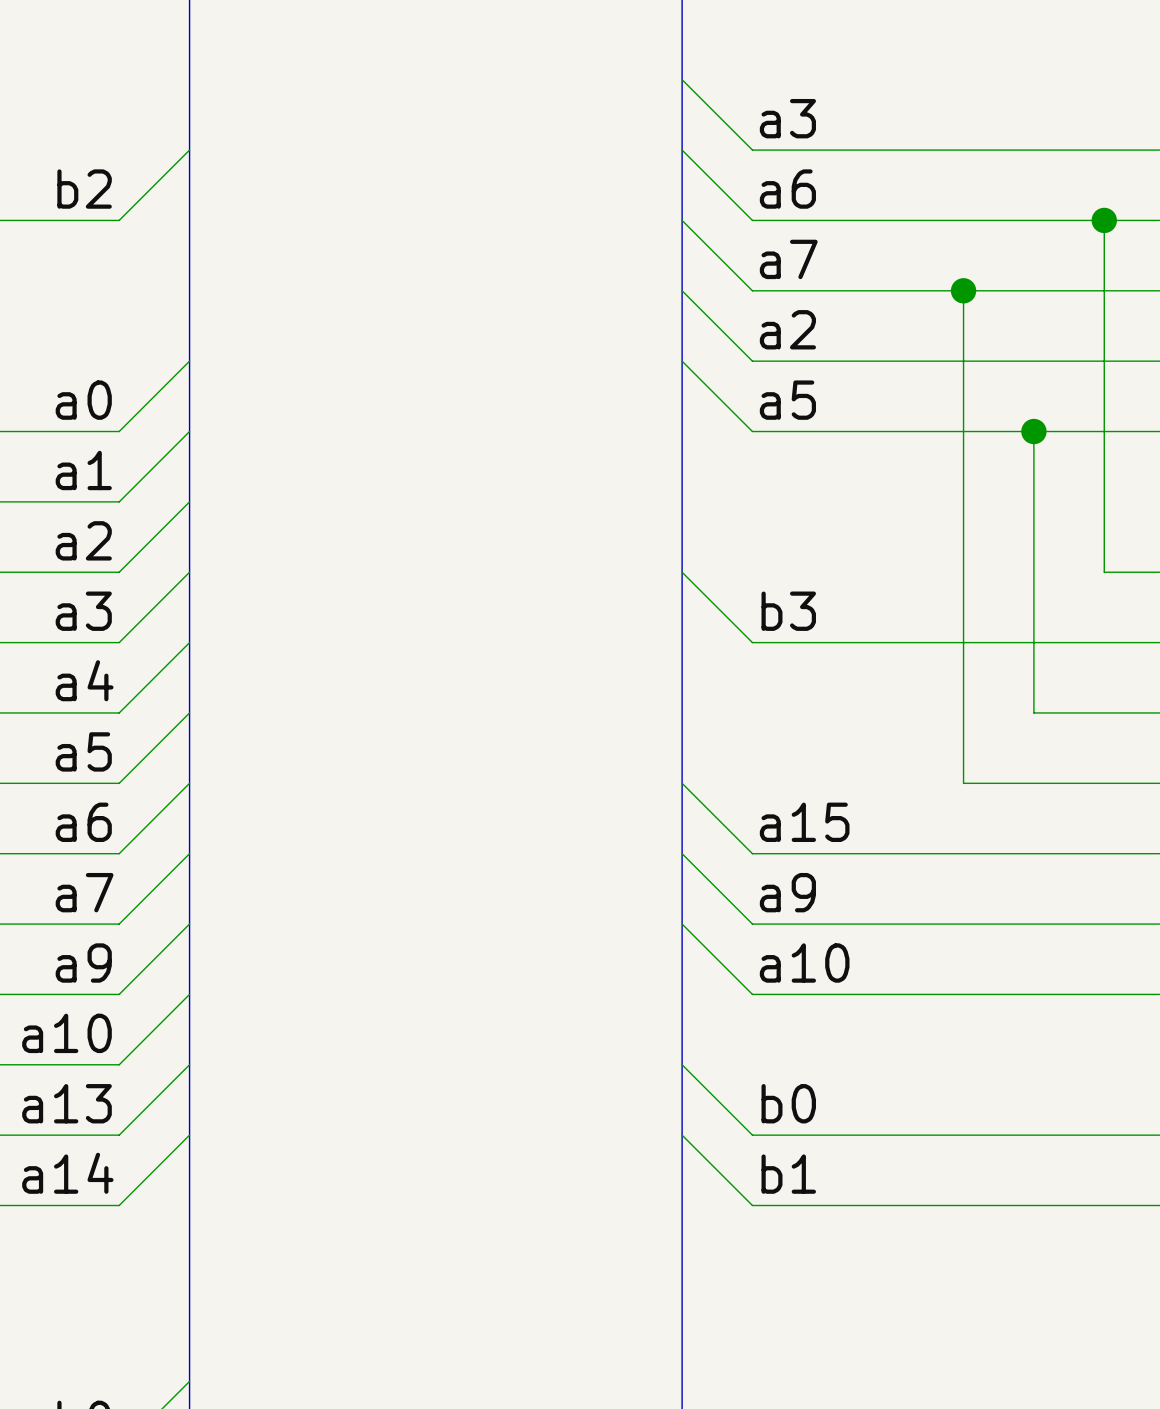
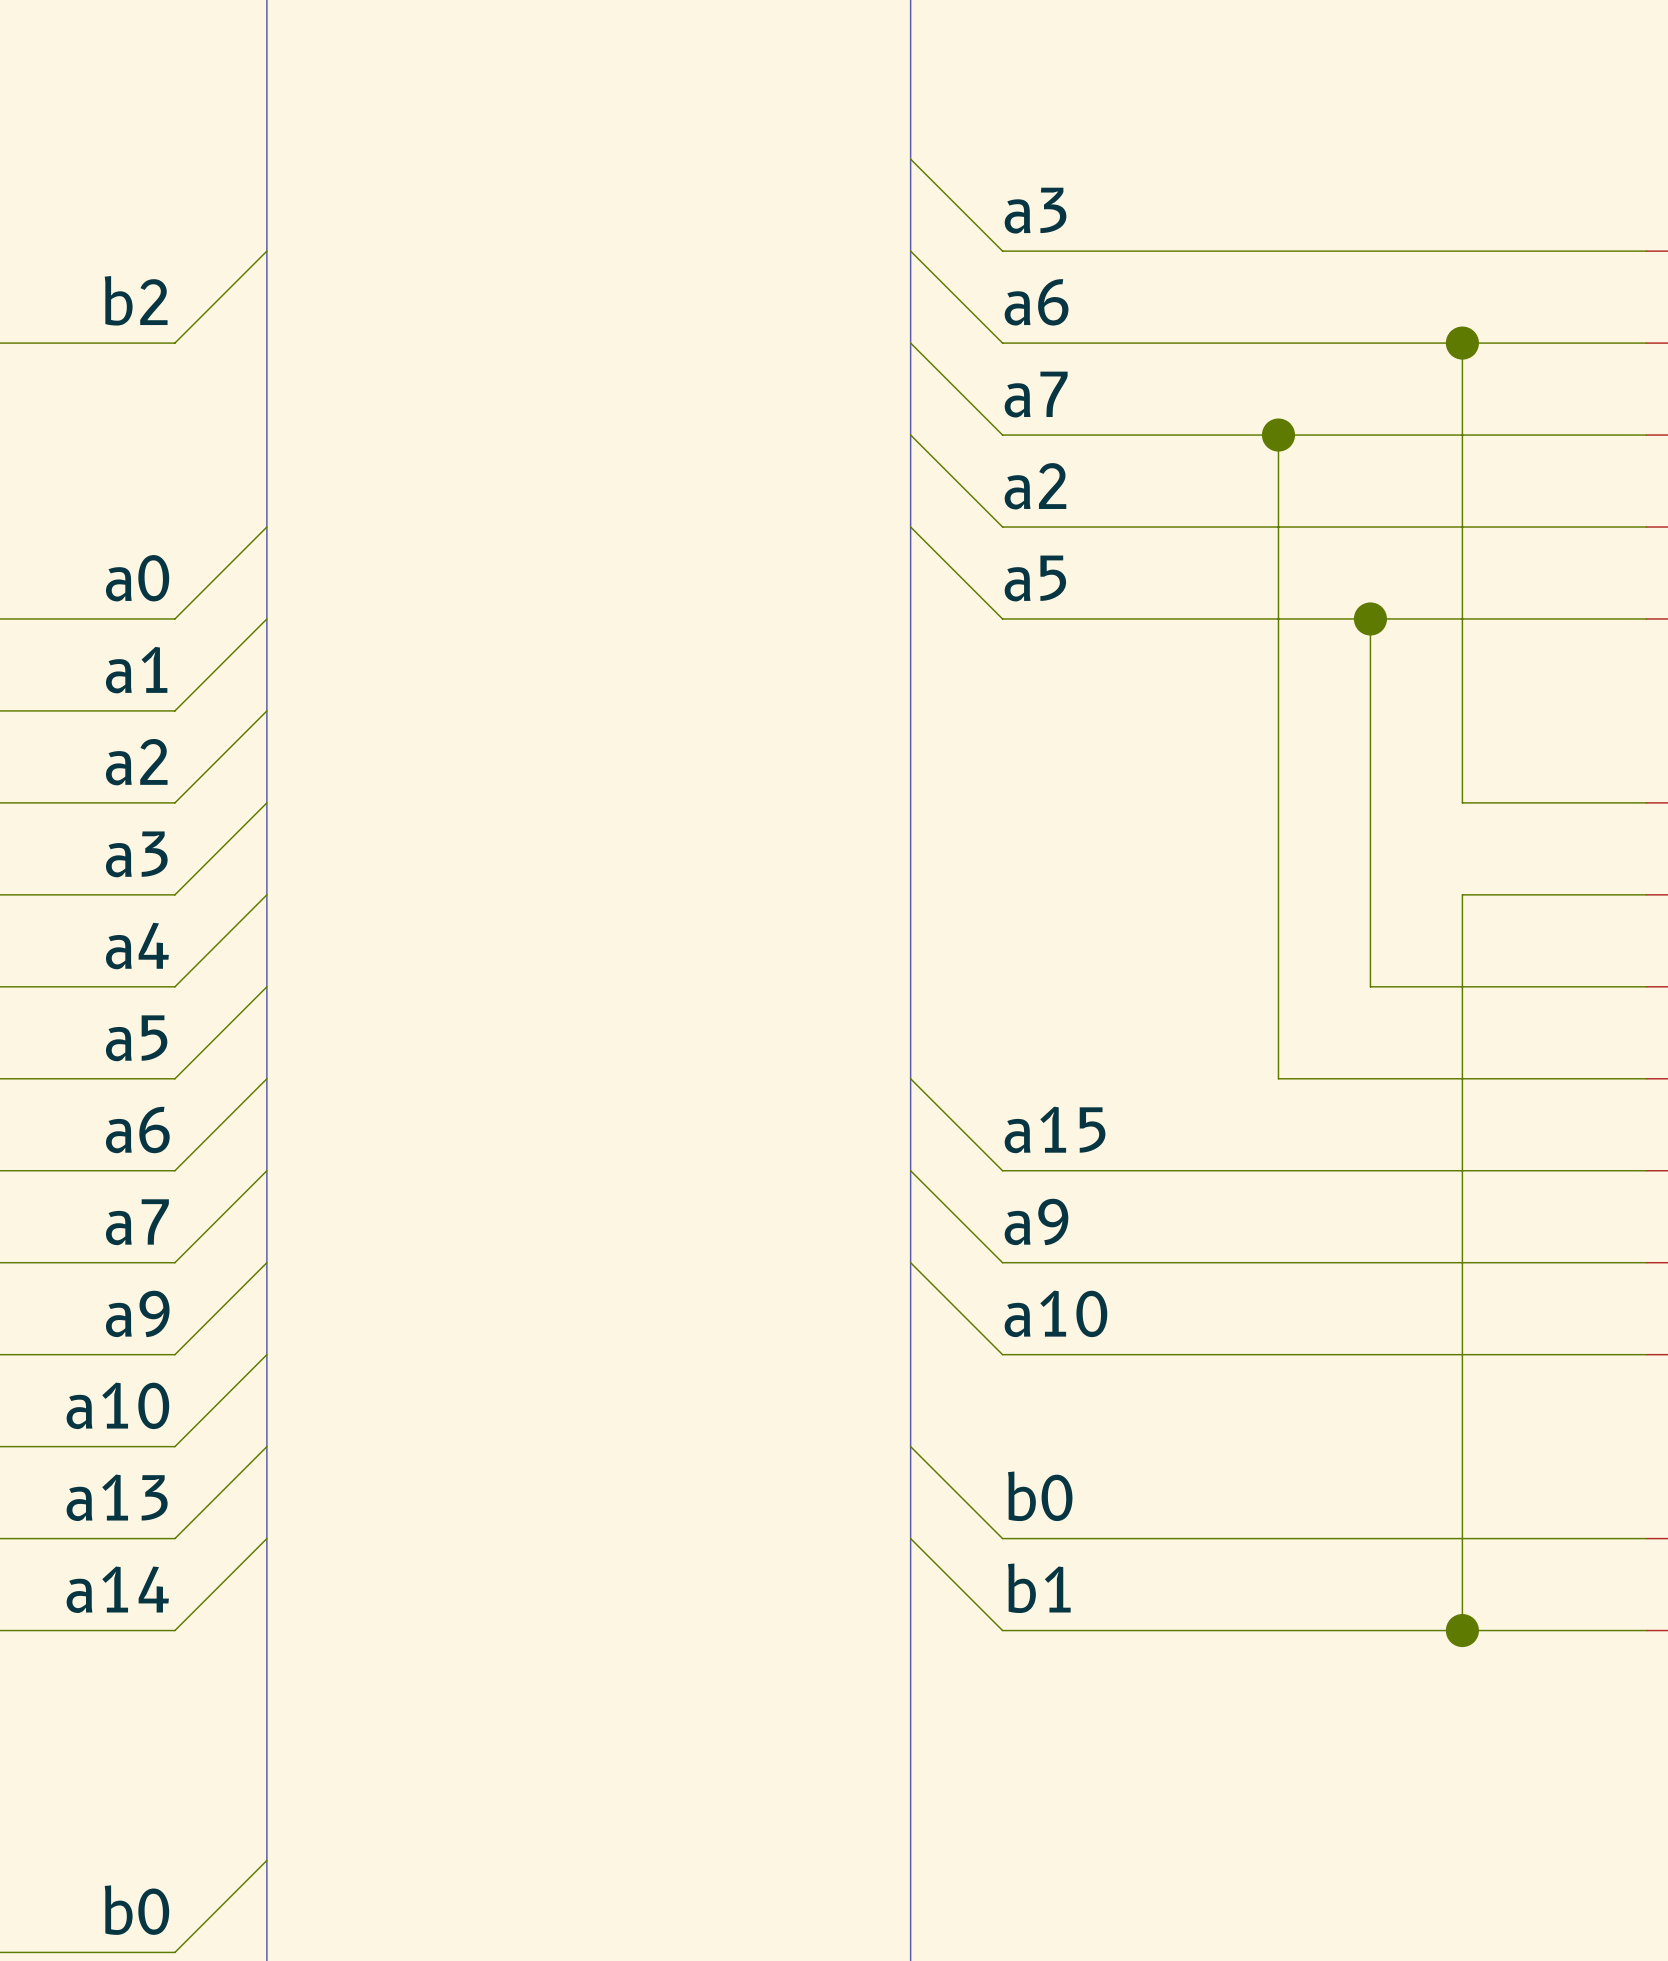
wire: (682, 572) (752, 642) (1104, 642) -> (1462, 1630) (1462, 894)
label: b3 (788, 611) -> none
junction: none -> (1462, 1630)

